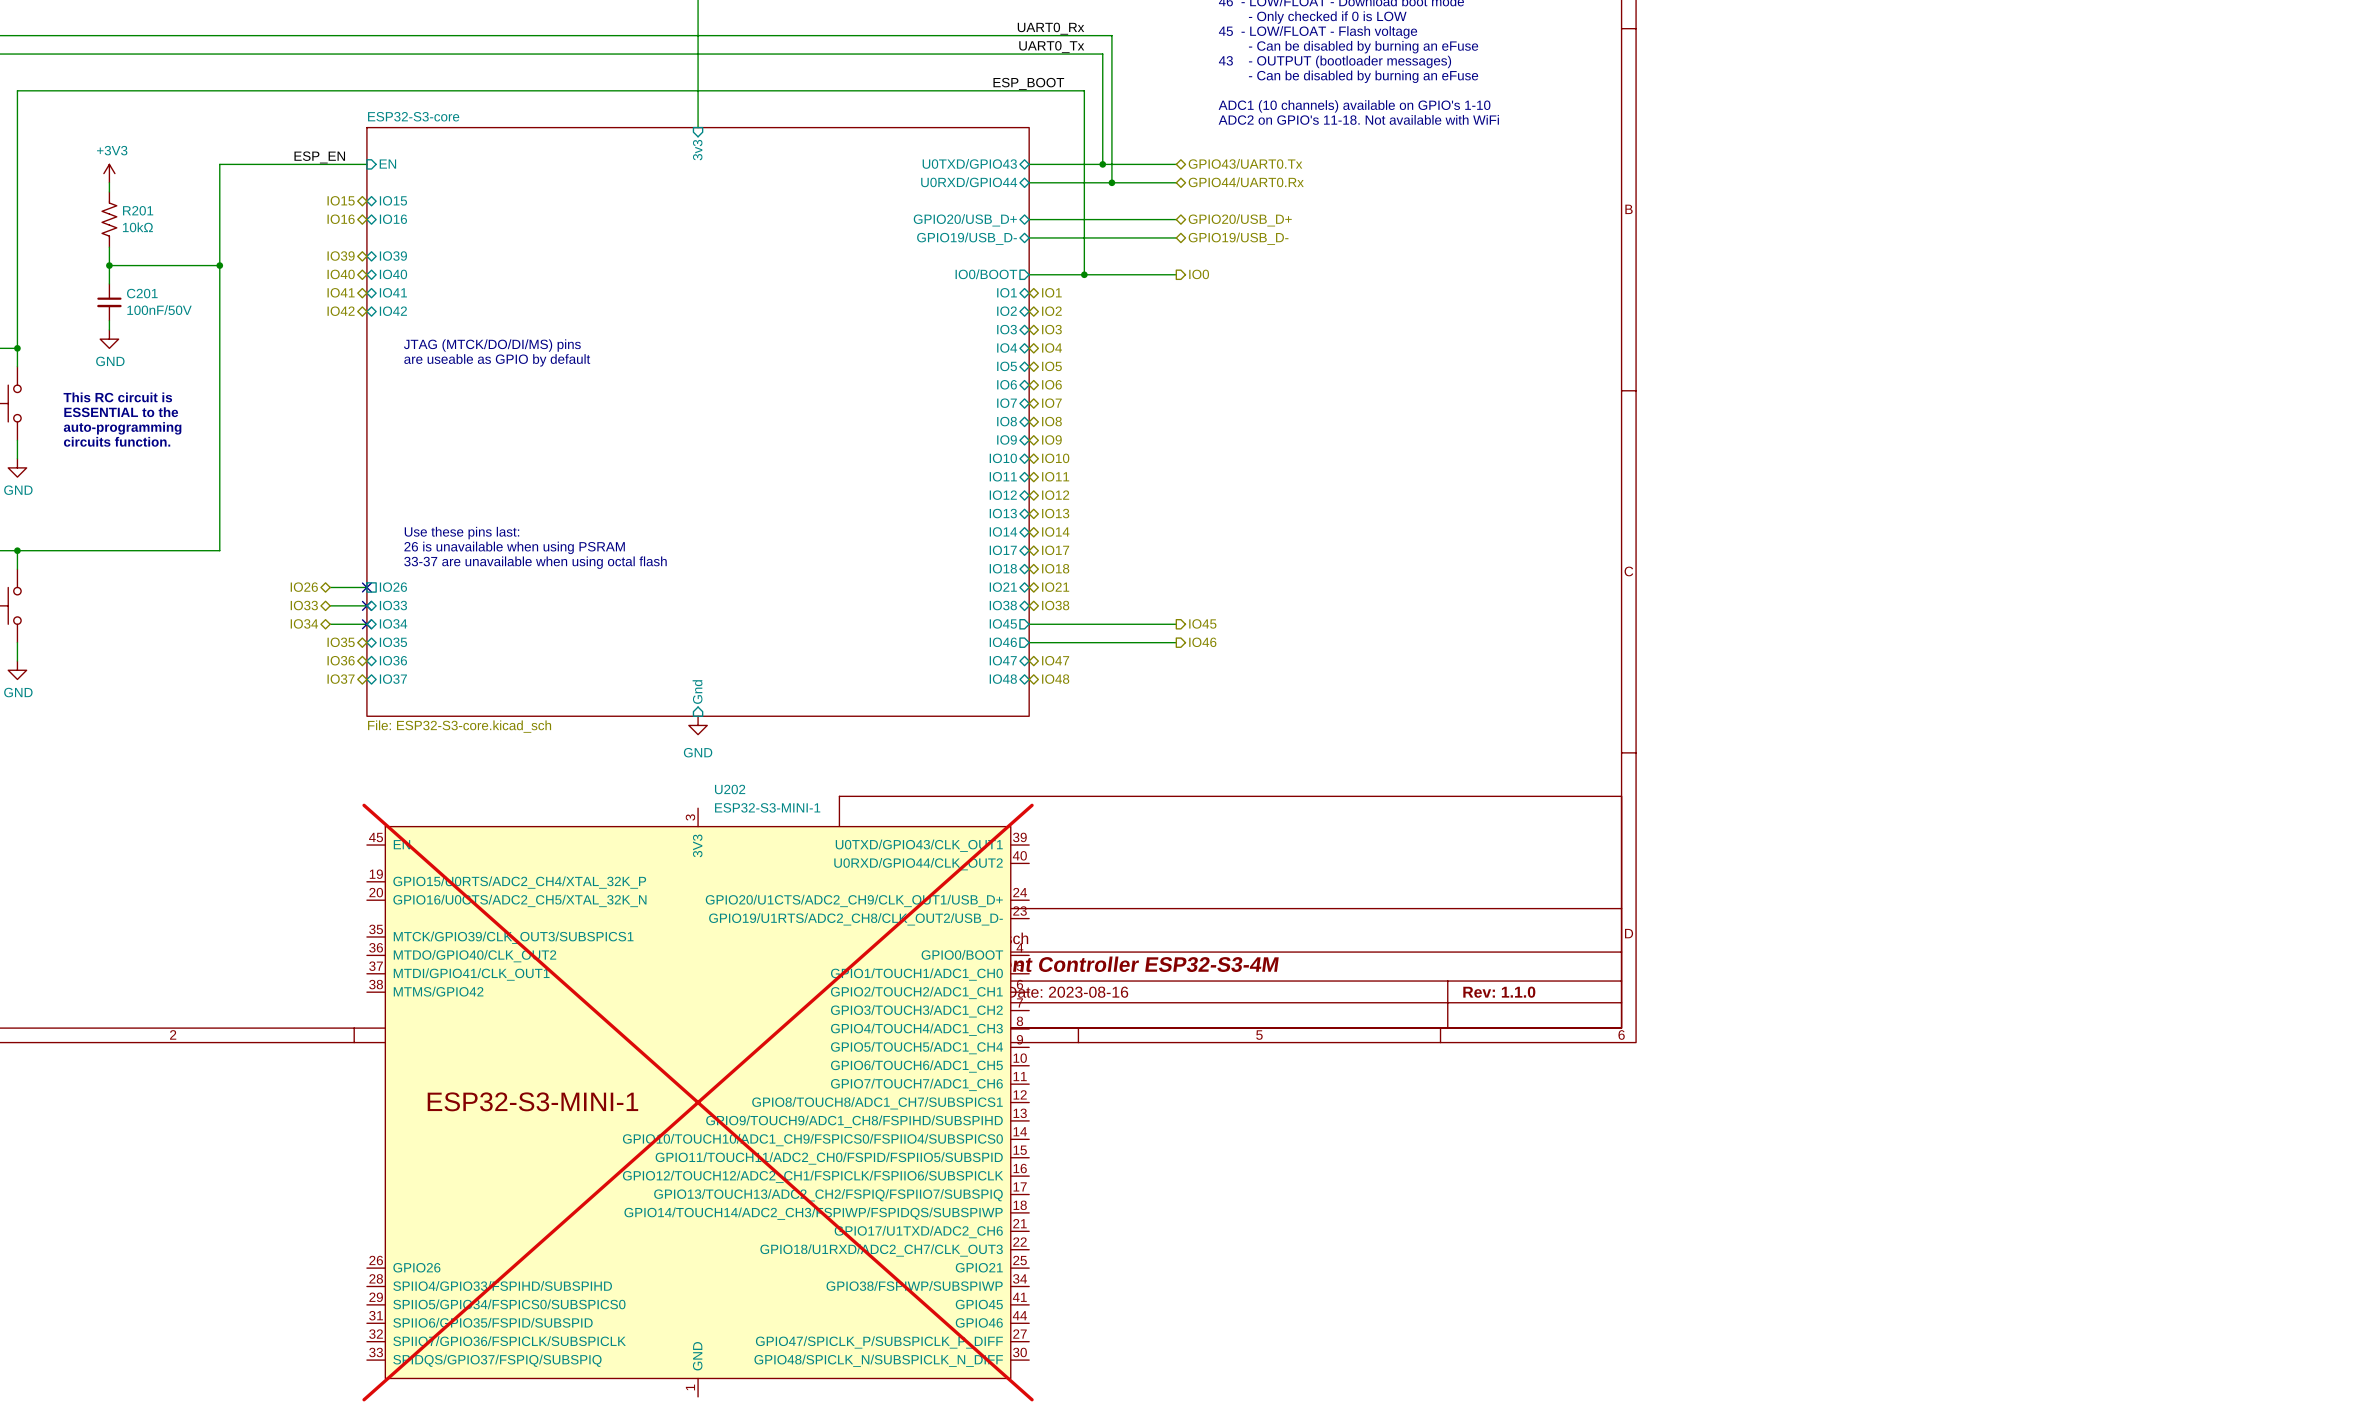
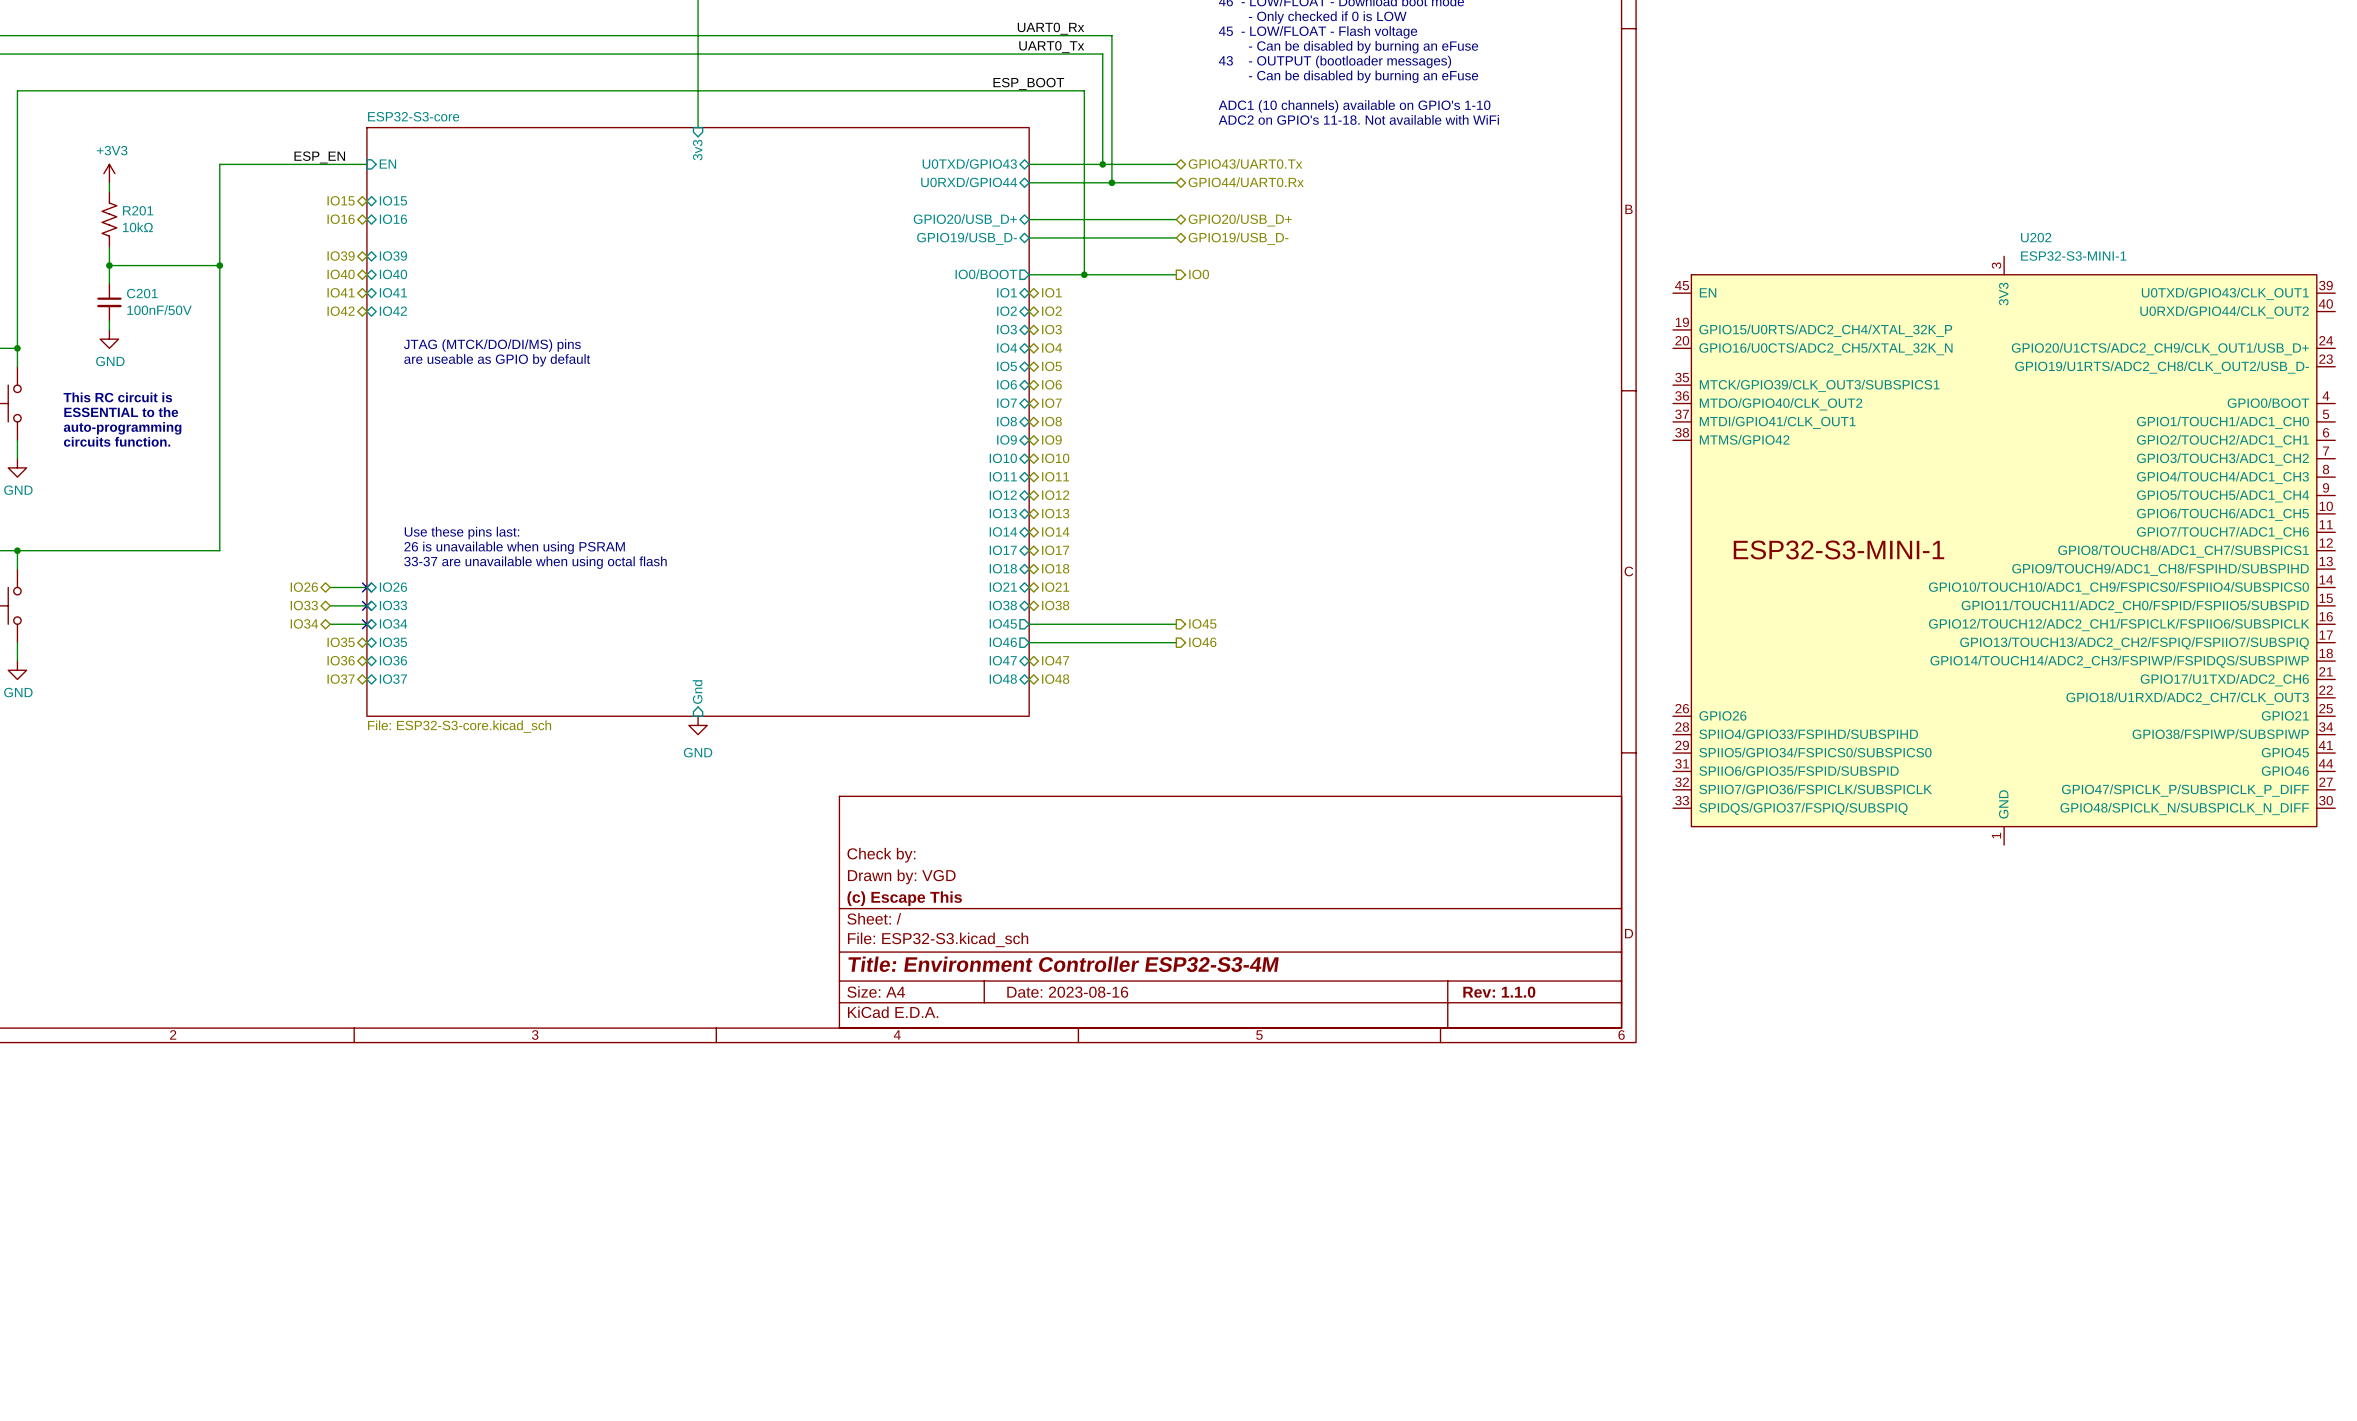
sheet pin shape: passive (393, 587) -> bidirectional (393, 587)
U202 position: (698, 1102) -> (2004, 550)
U202 do-not-place cross: (698, 1102) -> none

